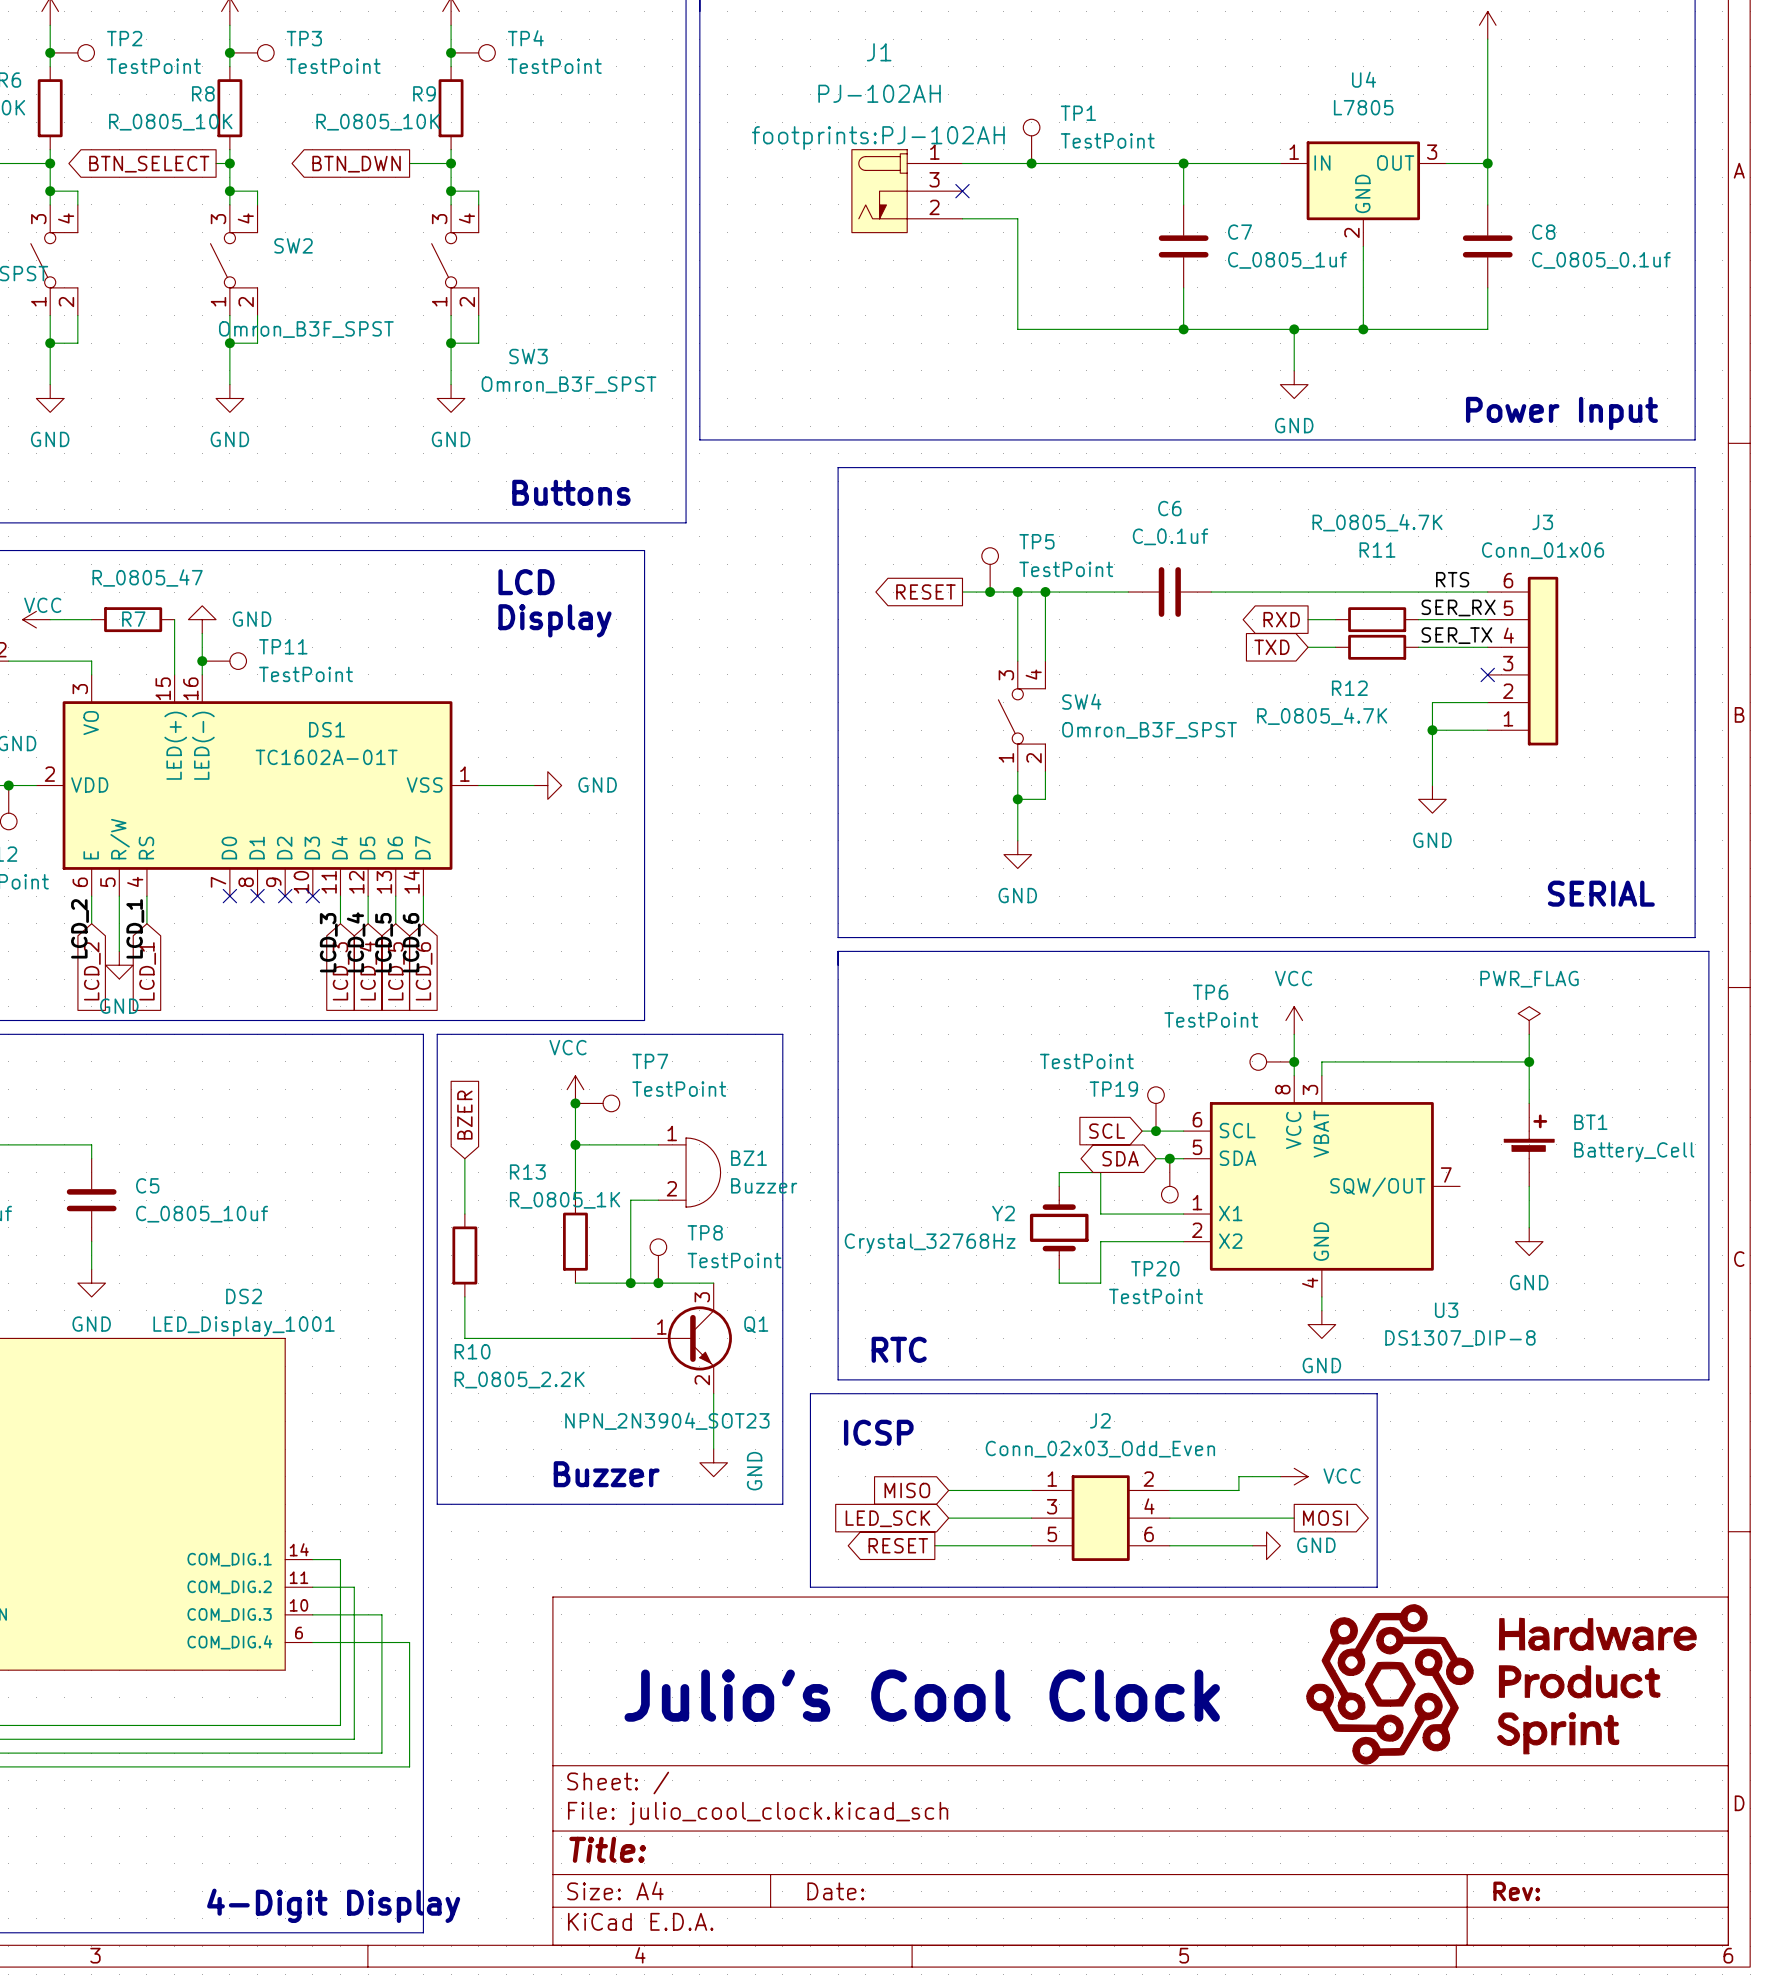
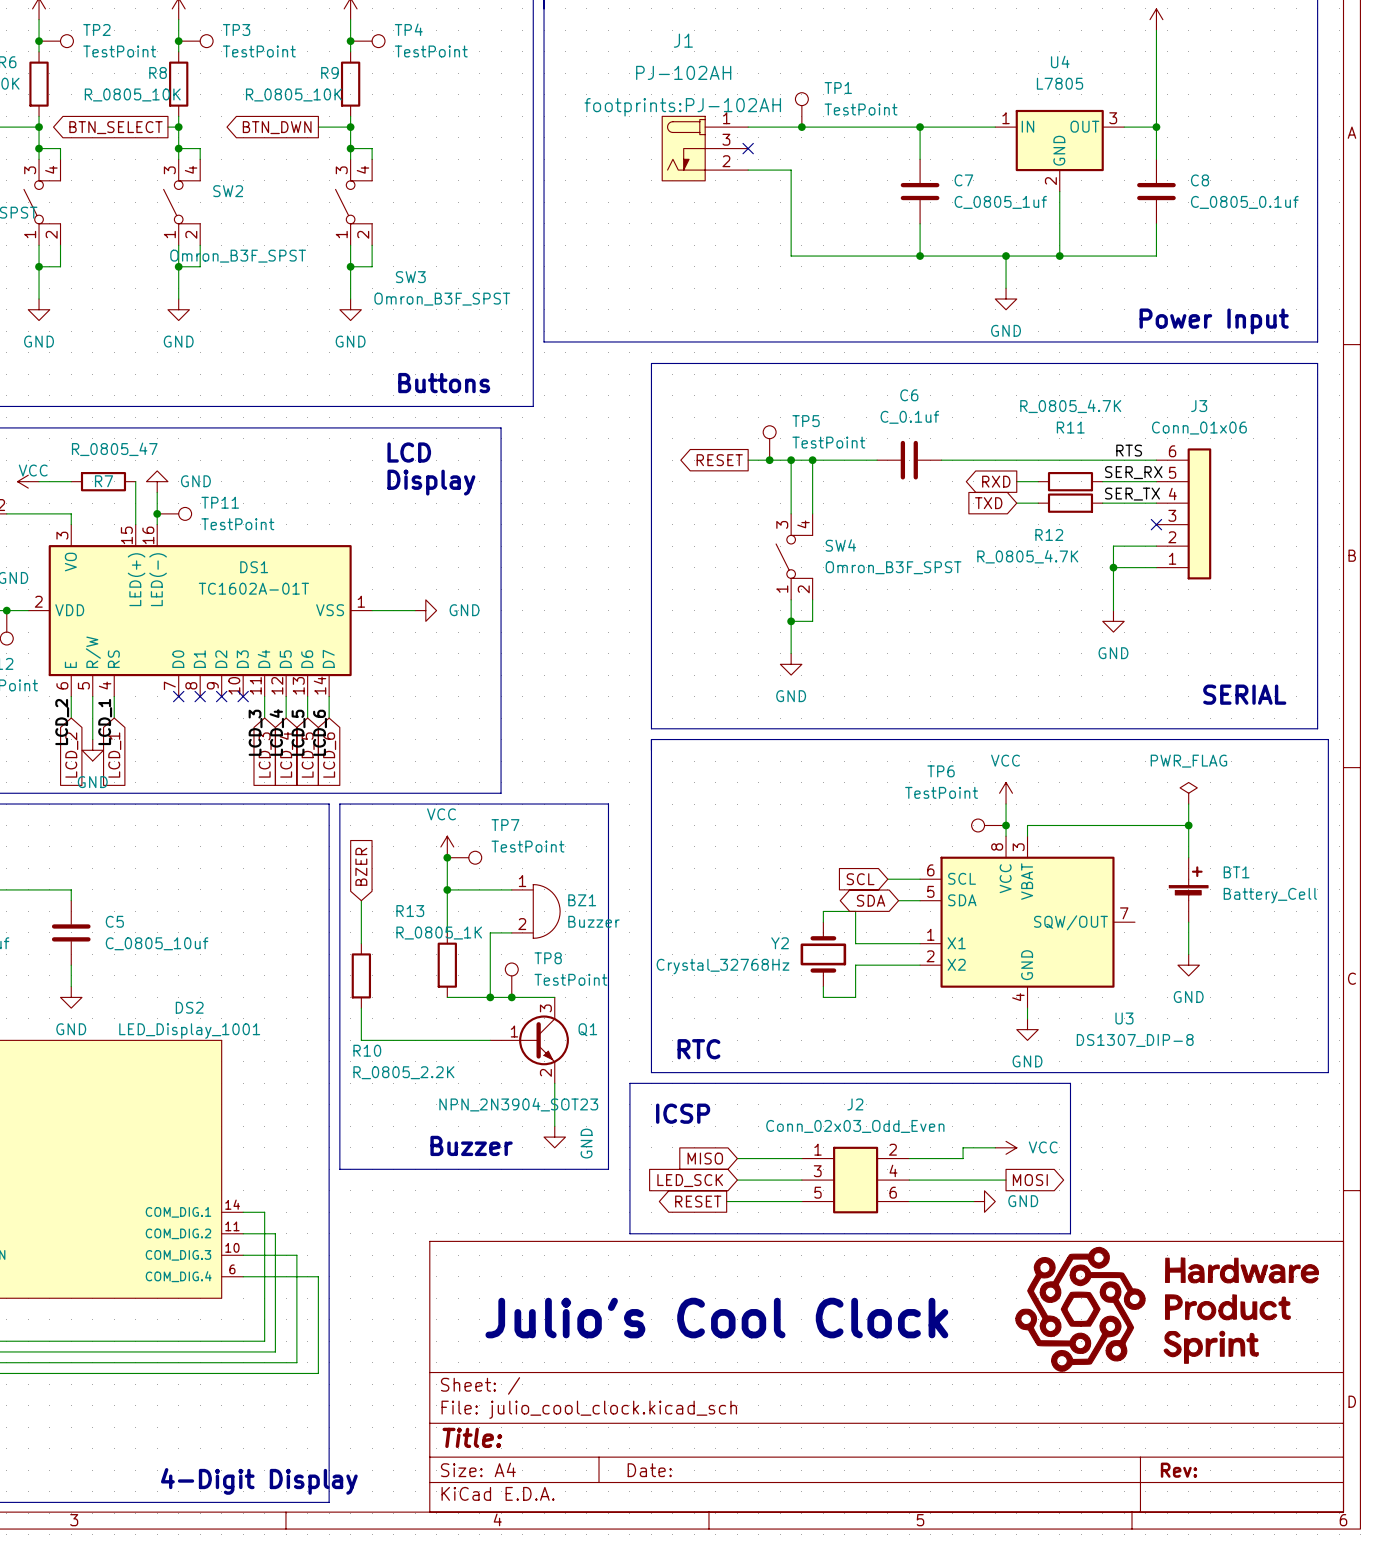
TP19: TestPoint (1156, 1108) -> none
junction: (1156, 1131) -> none
junction: (1169, 1158) -> none
TP20: TestPoint (1169, 1180) -> none

